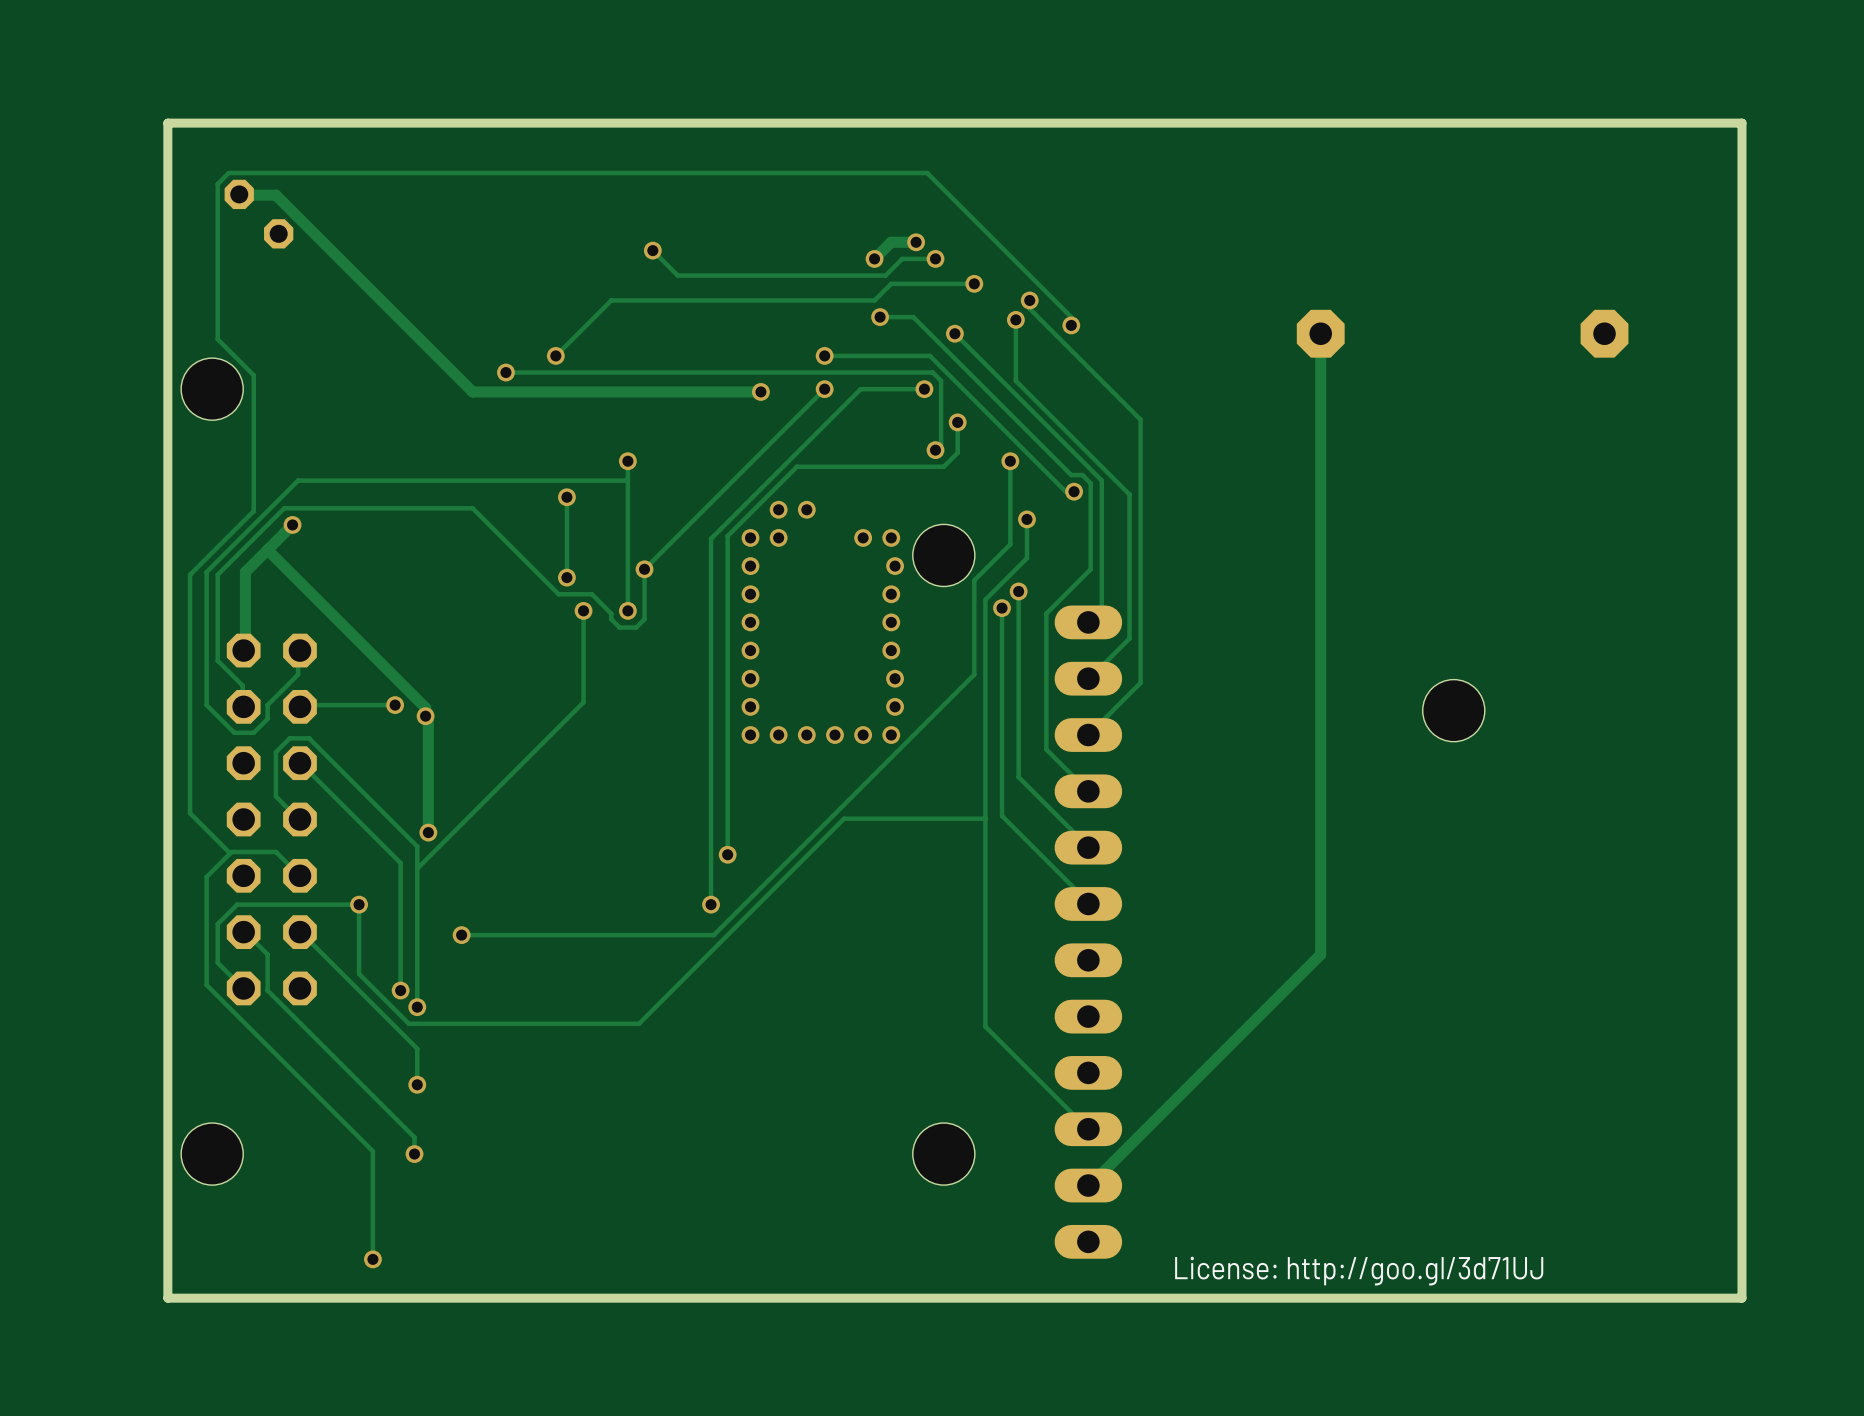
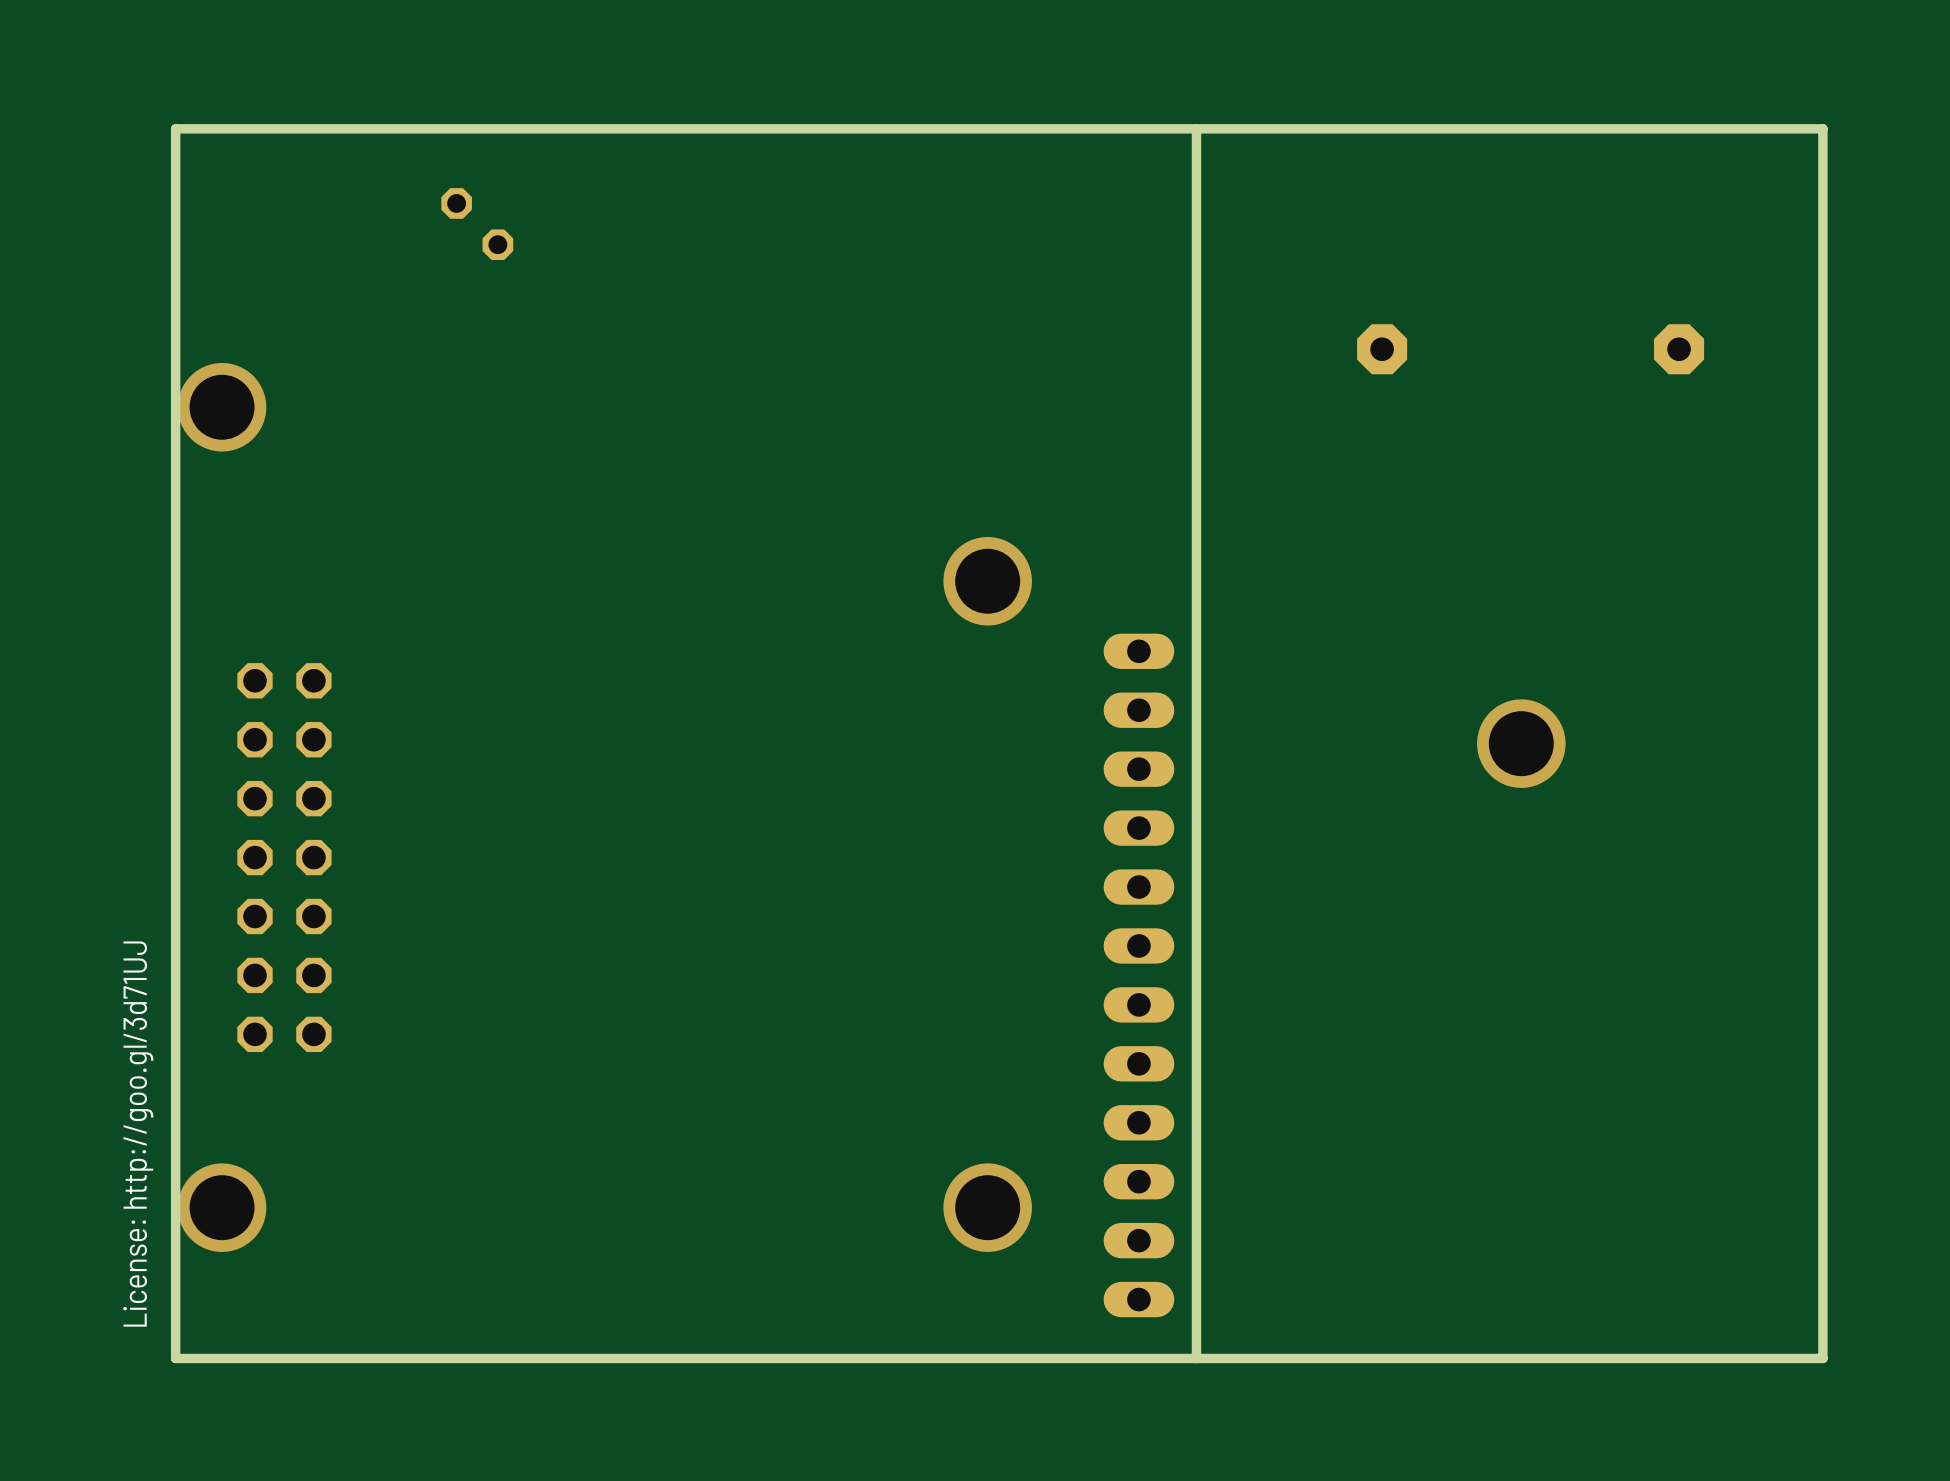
board edge: none -> (1196, 128) (1196, 1358)
track: (239, 194) (275, 195) (472, 391) (760, 391) -> none
part position: (258, 214) -> (477, 224)
track: (916, 242) (891, 242) (874, 258) -> none
via: (916, 242) -> none
track: (652, 250) (677, 275) (885, 275) (902, 258) (935, 258) -> none
via: (652, 250) -> none
via: (874, 258) -> none
via: (935, 258) -> none
track: (974, 283) (891, 283) (874, 300) (611, 300) (555, 355) -> none
via: (974, 283) -> none
track: (1029, 300) (1029, 308) (1140, 419) (1140, 682) (1088, 735) -> none
via: (1029, 300) -> none
track: (880, 317) (913, 317) (1071, 475) (1082, 475) (1090, 483) (1090, 569) (1046, 613) (1046, 749) (1088, 791) -> none
via: (880, 317) -> none
track: (1015, 319) (1015, 380) (1129, 494) (1129, 638) (1088, 678) -> none
via: (1015, 319) -> none
track: (1071, 325) (1071, 317) (927, 173) (228, 173) (217, 184) (217, 339) (253, 375) (253, 511) (190, 574) (190, 813) (230, 853) -> none
via: (1071, 325) -> none
track: (954, 333) (1101, 480) (1101, 610) (1088, 622) -> none
via: (954, 333) -> none
track: (1320, 333) (1320, 954) (1088, 1185) -> none
via: (555, 355) -> none
track: (824, 355) (929, 355) (1065, 491) (1074, 491) -> none
via: (824, 355) -> none
track: (505, 372) (932, 372) (941, 380) (941, 444) (935, 450) -> none
via: (505, 372) -> none
hole: (212, 389) -> none
via: none -> (222, 407)
track: (824, 389) (644, 569) (644, 619) (636, 627) (619, 627) (611, 619) (611, 613) (591, 594) (558, 594) (472, 508) (284, 508) (217, 574) (217, 660) (242, 685) (243, 706) -> none
via: (824, 389) -> none
track: (924, 389) (860, 389) (711, 538) (711, 904) -> none
via: (924, 389) -> none
via: (760, 391) -> none
track: (957, 422) (957, 452) (943, 466) (796, 466) (727, 536) (727, 854) -> none
via: (957, 422) -> none
via: (935, 450) -> none
track: (627, 461) (627, 610) -> none
via: (627, 461) -> none
track: (1010, 461) (1010, 544) (974, 580) (974, 674) (713, 935) (461, 935) -> none
via: (1010, 461) -> none
track: (627, 480) (298, 480) (206, 572) (206, 705) (234, 732) (253, 732) (267, 718) (267, 705) (298, 674) (298, 652) (299, 650) -> none
via: (1074, 491) -> none
track: (566, 497) (566, 577) -> none
via: (566, 497) -> none
via: (778, 509) -> none
via: (806, 509) -> none
track: (1026, 519) (1026, 558) (985, 599) (985, 1026) (1088, 1129) -> none
via: (1026, 519) -> none
track: (292, 524) (245, 572) (245, 649) (243, 650) -> none
via: (292, 524) -> none
via: (750, 537) -> none
via: (778, 537) -> none
via: (863, 537) -> none
via: (891, 537) -> none
track: (267, 549) (425, 707) (425, 716) (428, 718) (428, 832) -> none
hole: (943, 555) -> none
via: none -> (987, 581)
via: (750, 566) -> none
via: (895, 566) -> none
via: (644, 569) -> none
via: (566, 577) -> none
track: (1018, 591) (1018, 777) (1088, 847) -> none
via: (1018, 591) -> none
via: (750, 594) -> none
via: (891, 594) -> none
track: (1002, 608) (1002, 815) (1088, 903) -> none
via: (1002, 608) -> none
track: (583, 610) (583, 702) (417, 868) -> none
via: (583, 610) -> none
via: (627, 610) -> none
via: (750, 622) -> none
via: (891, 622) -> none
via: (750, 650) -> none
via: (891, 650) -> none
via: (750, 678) -> none
via: (895, 678) -> none
track: (395, 705) (300, 705) (299, 706) -> none
via: (395, 705) -> none
via: (750, 706) -> none
via: (895, 706) -> none
hole: (1453, 710) -> none
via: none -> (1521, 743)
via: (425, 716) -> none
via: (750, 735) -> none
via: (778, 735) -> none
via: (806, 735) -> none
via: (834, 735) -> none
via: (863, 735) -> none
via: (891, 735) -> none
track: (299, 763) (400, 863) (400, 990) -> none
track: (985, 818) (844, 818) (638, 1023) (408, 1023) (359, 973) (359, 904) (237, 904) (217, 924) (217, 962) (243, 988) -> none
track: (299, 819) (275, 796) (275, 752) (289, 738) (309, 738) (417, 846) (417, 1007) -> none
via: (428, 832) -> none
via: (727, 854) -> none
track: (299, 875) (275, 851) (231, 851) (206, 876) (206, 985) (372, 1151) (372, 1259) -> none
via: (359, 904) -> none
via: (711, 904) -> none
track: (243, 932) (267, 954) (267, 990) (414, 1137) (414, 1154) -> none
track: (299, 932) (417, 1048) (417, 1084) -> none
via: (461, 935) -> none
via: (400, 990) -> none
via: (417, 1007) -> none
text: none -> License: http://goo.gl/3d71UJ (138, 1134)
via: (417, 1084) -> none
hole: (212, 1154) -> none
via: none -> (222, 1207)
via: (414, 1154) -> none
hole: (943, 1154) -> none
via: none -> (987, 1207)
via: (372, 1259) -> none
text: License: http://goo.gl/3d71UJ (1359, 1271) -> none

